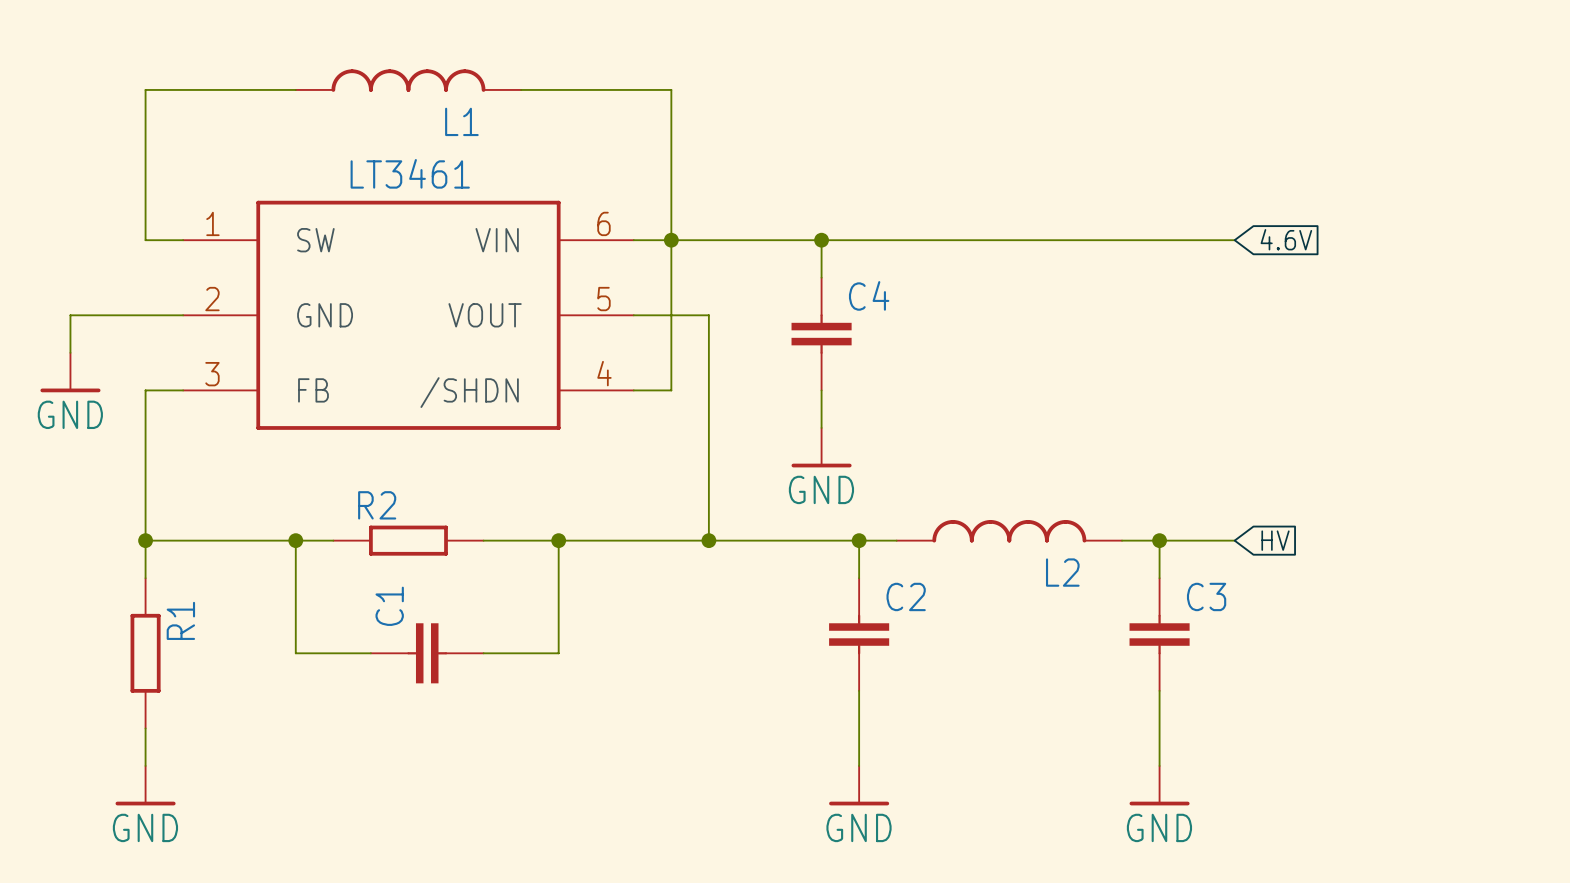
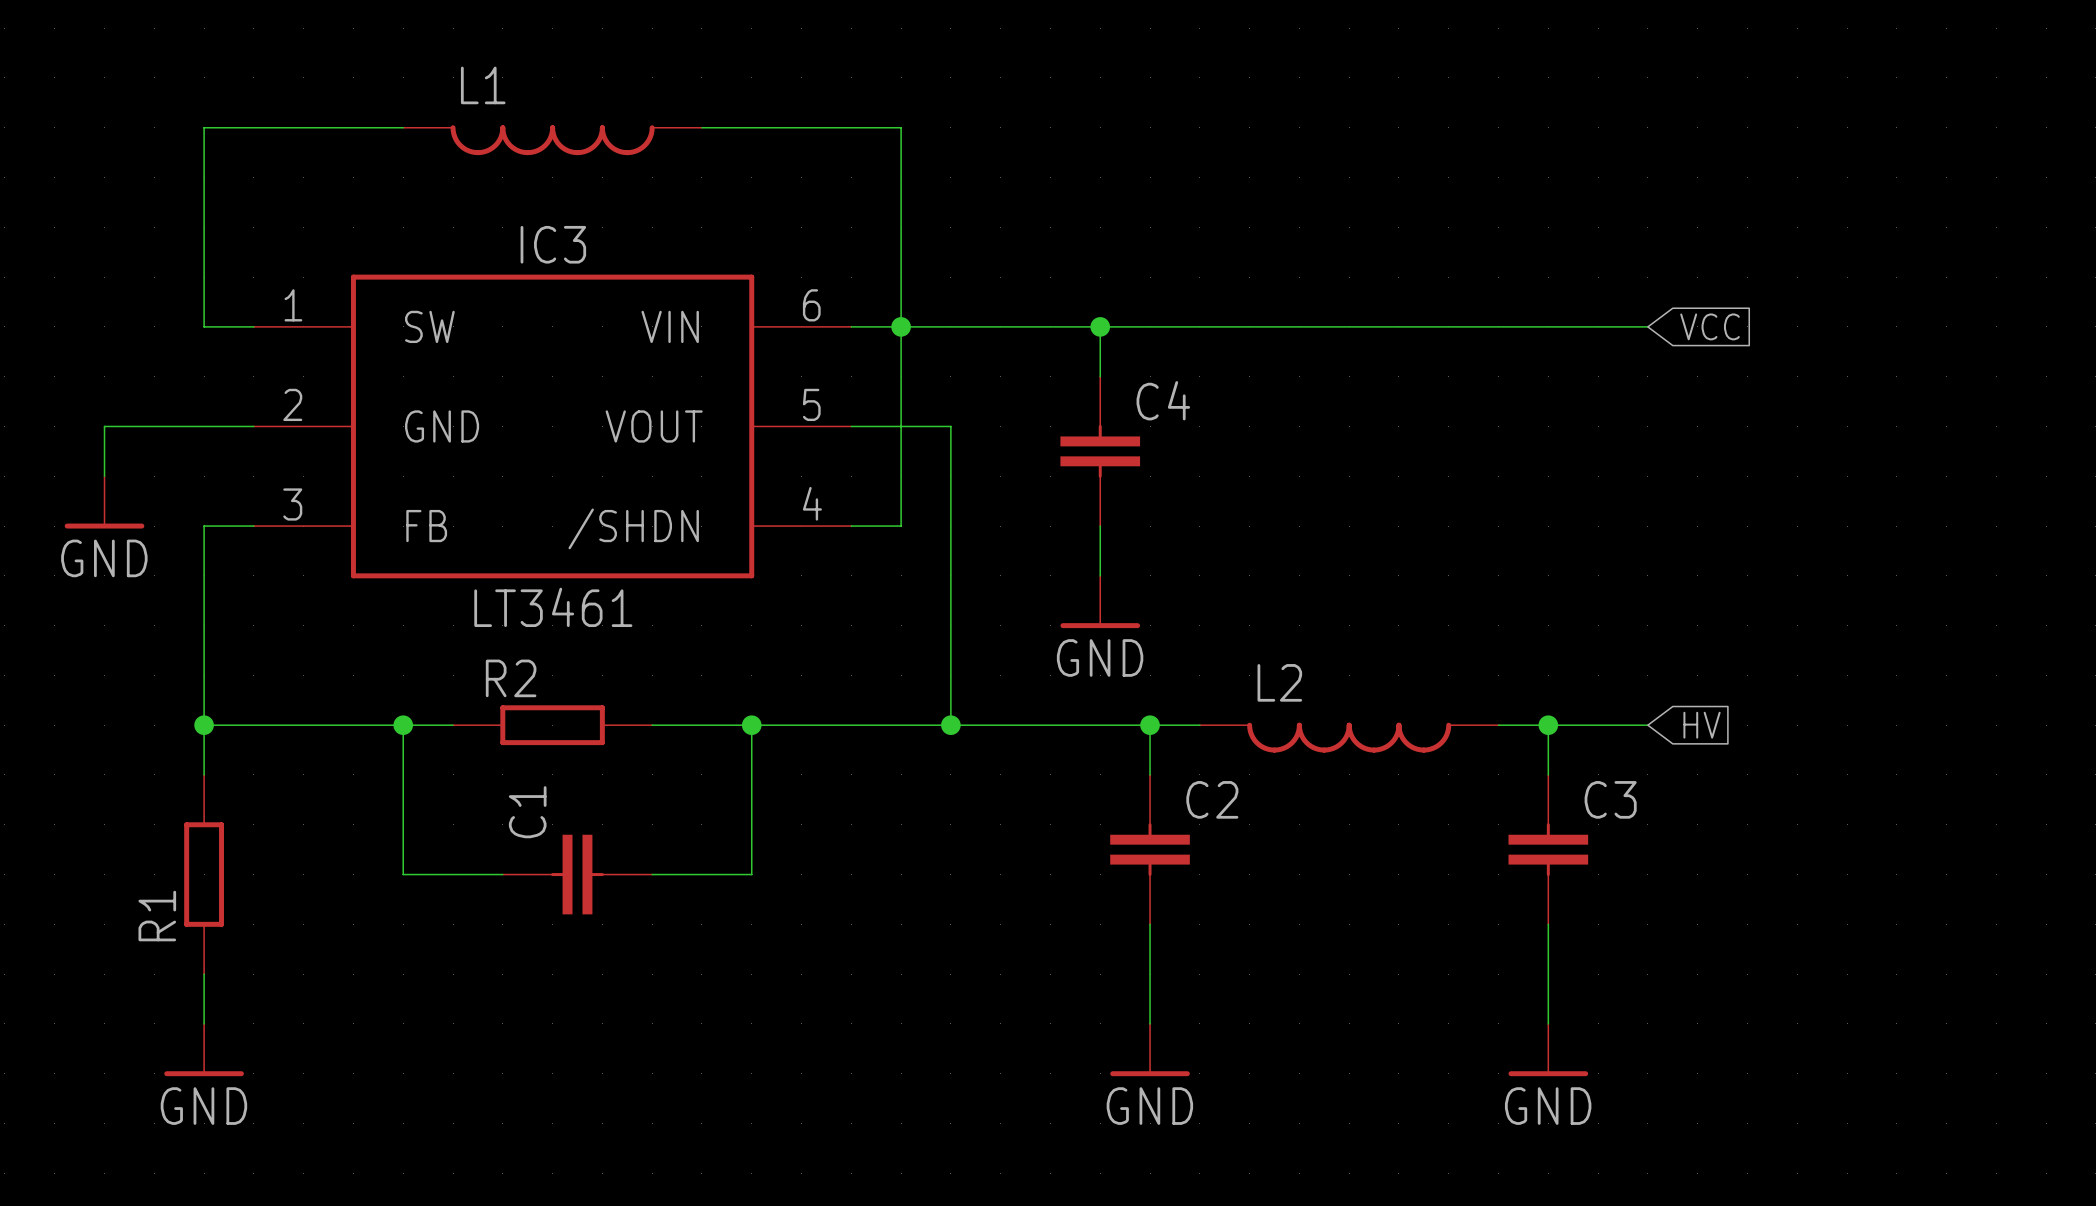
L1 rotation: 0° (408, 80) -> 180° (552, 140)
IC3 text: LT3461 (410, 173) -> none
IC3 name: none -> IC3 (553, 244)
global label: 4.6V (1286, 239) -> VCC (1710, 326)
IC3 value: none -> LT3461 (553, 607)
L2 rotation: 0° (1009, 531) -> 180° (1349, 737)
R1 name position: R1 (180, 620) -> R1 (157, 916)

